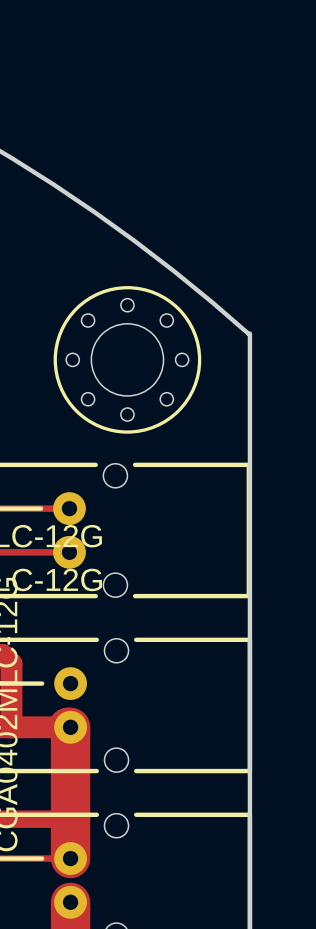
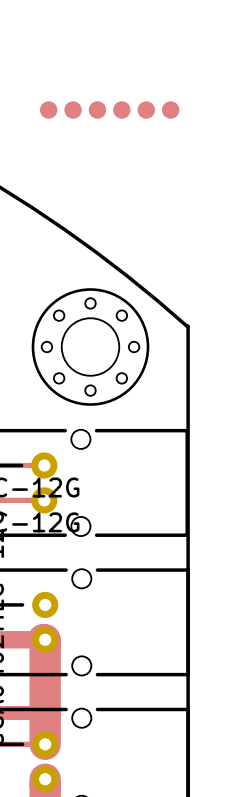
part: none -> (48, 110)
part: none -> (73, 110)
part: none -> (97, 110)
part: none -> (121, 110)
part: none -> (146, 110)
part: none -> (170, 110)

